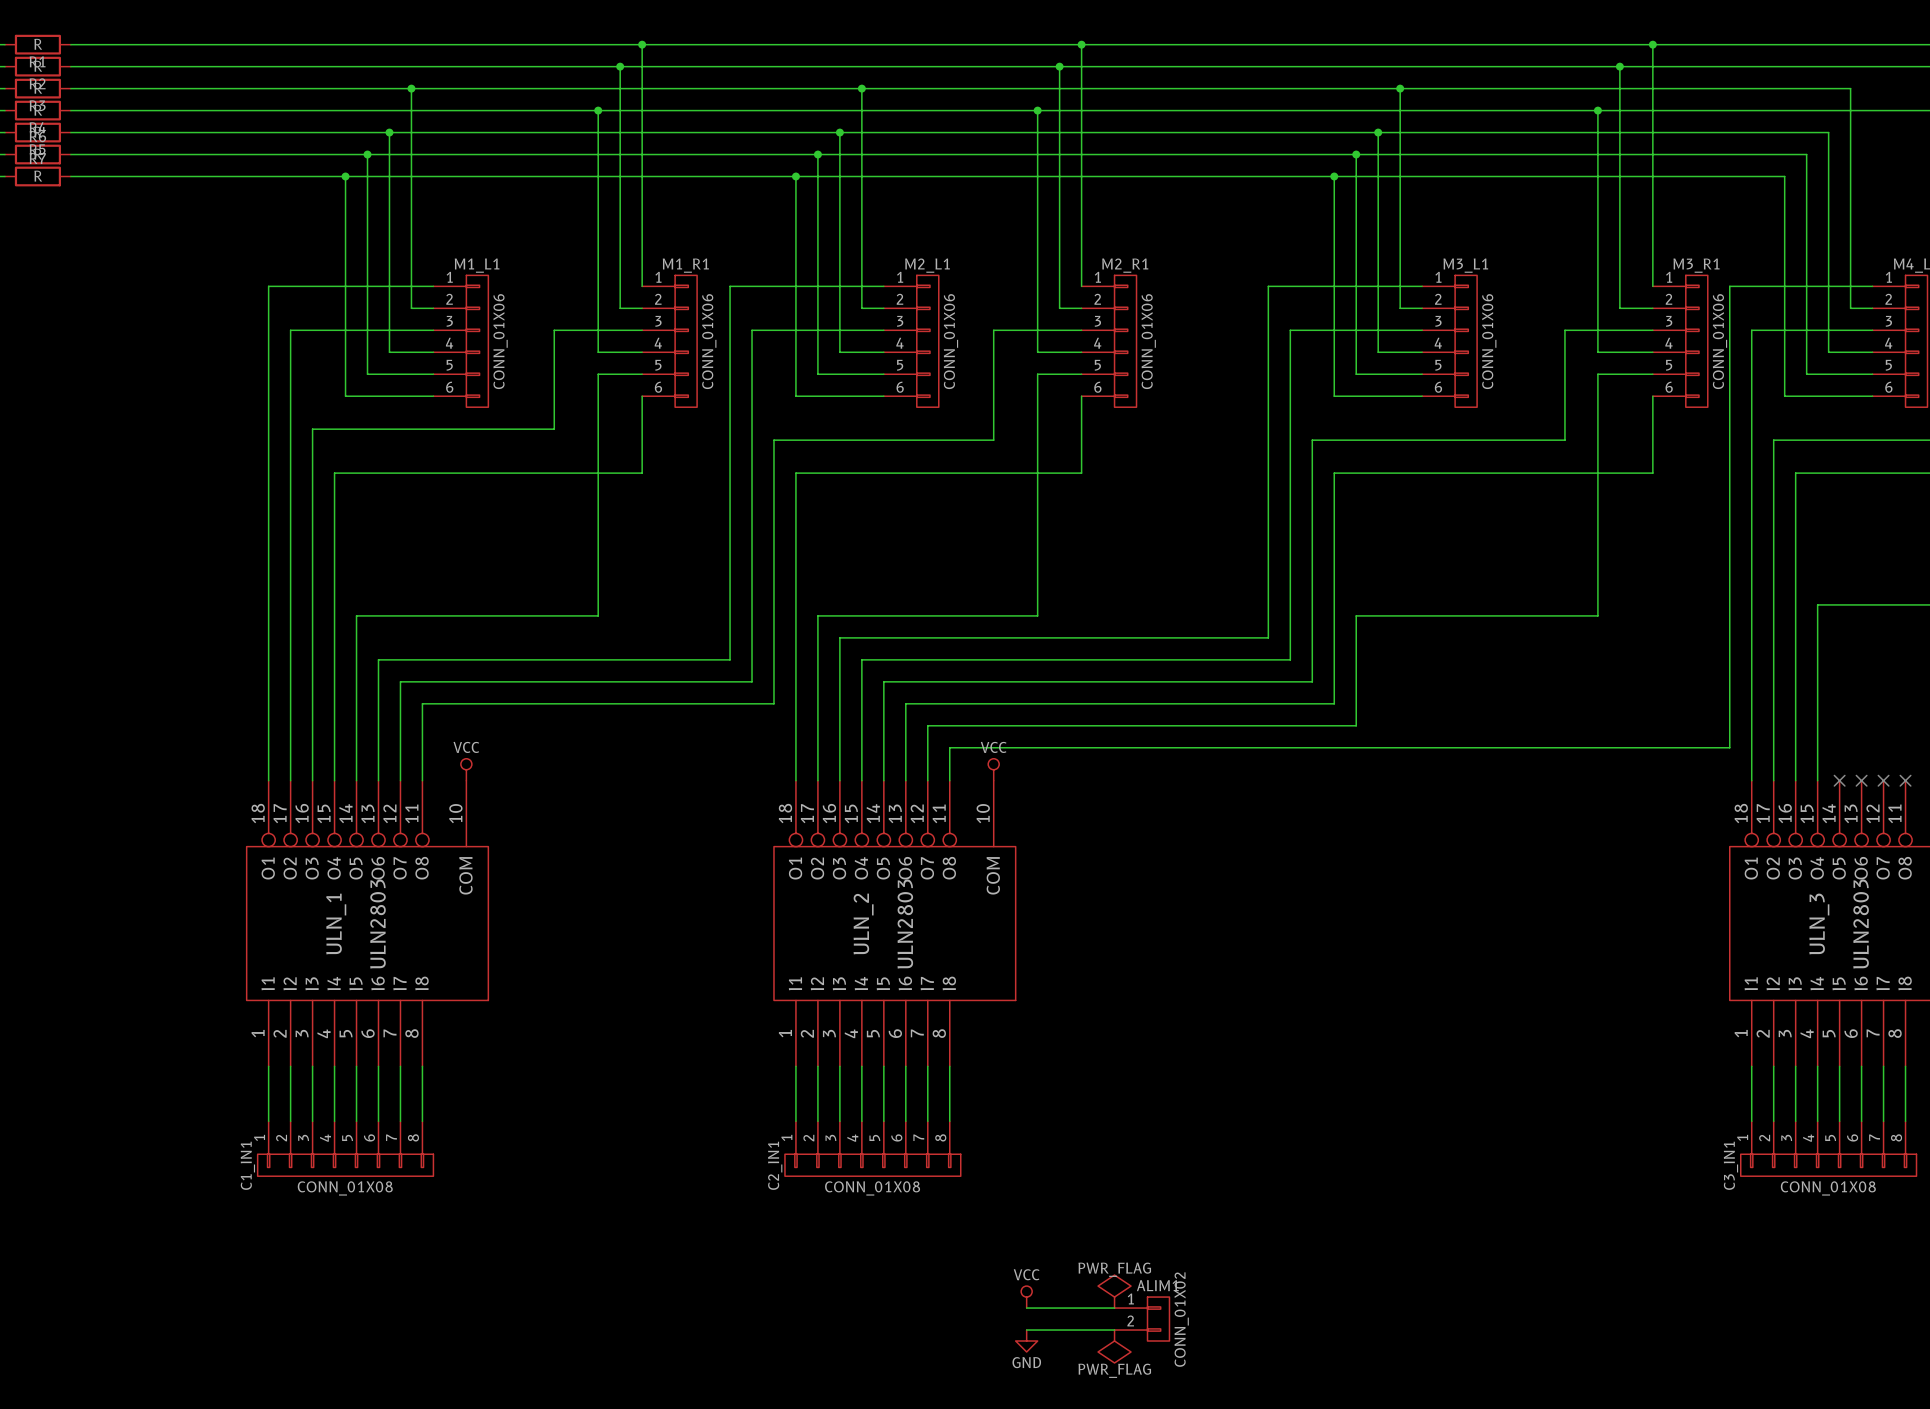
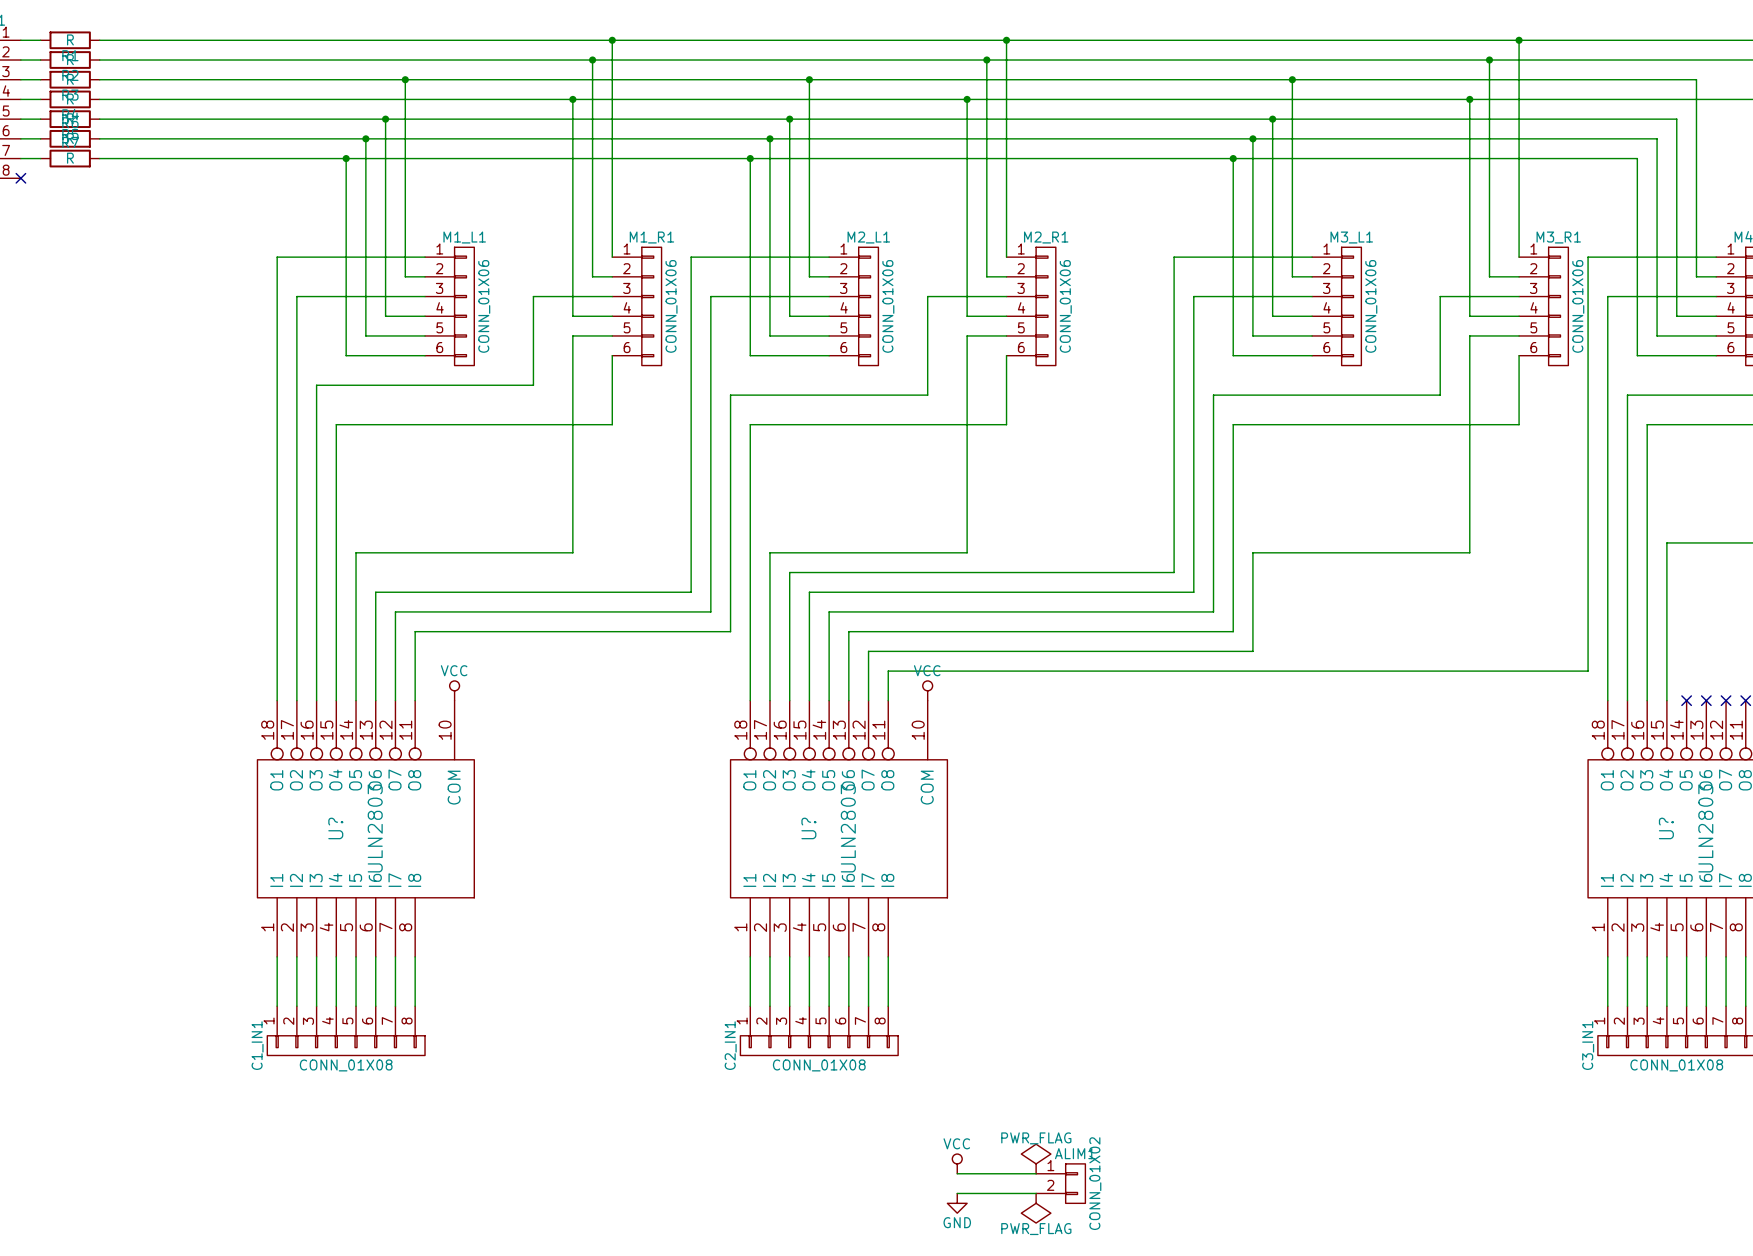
ULN_1 name: ULN_1 (336, 924) -> U? (335, 828)
ULN_2 name: ULN_2 (863, 924) -> U? (808, 828)
ULN_3 name: ULN_3 (1819, 924) -> U? (1666, 828)

